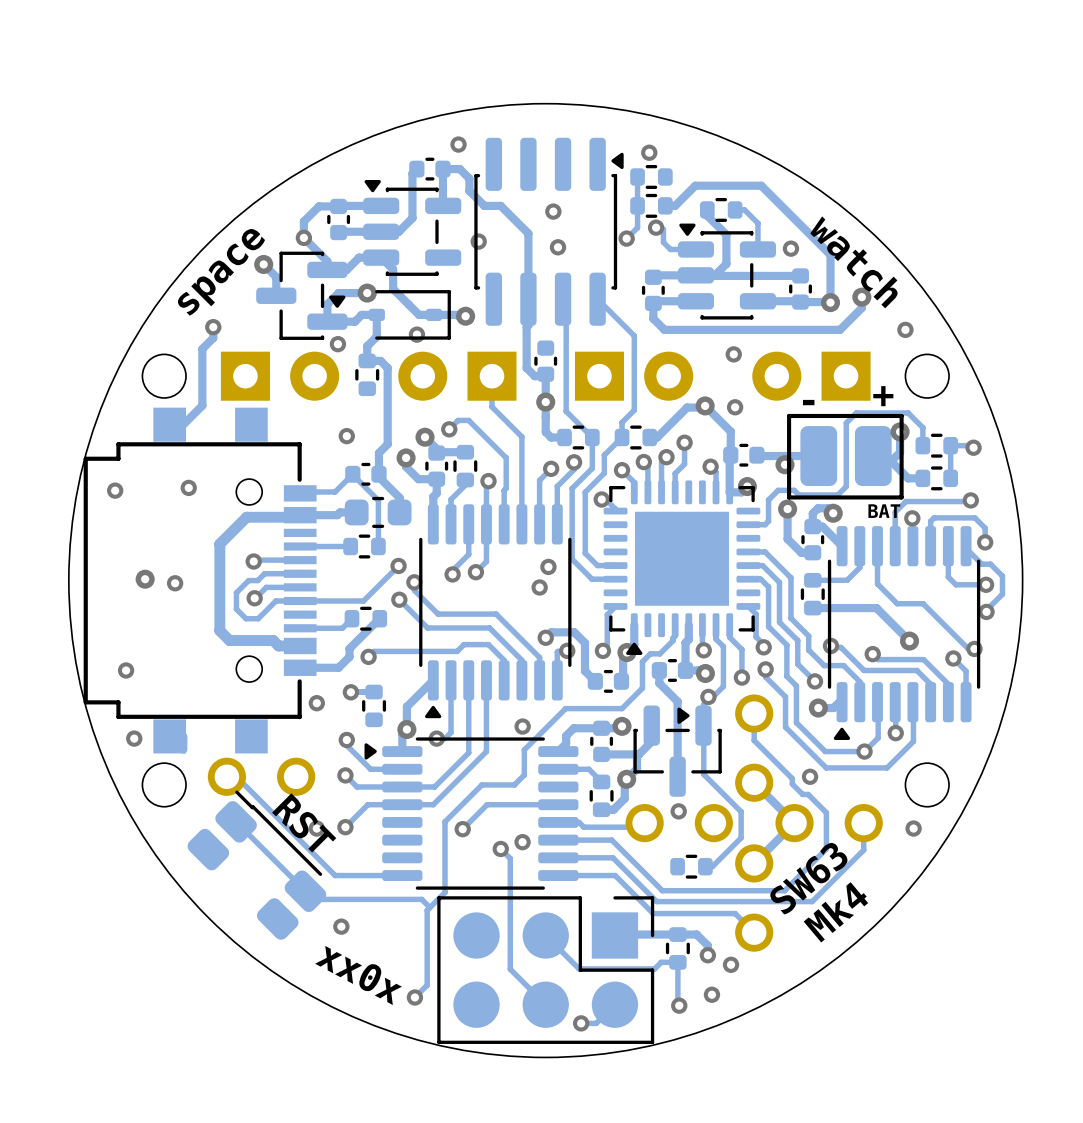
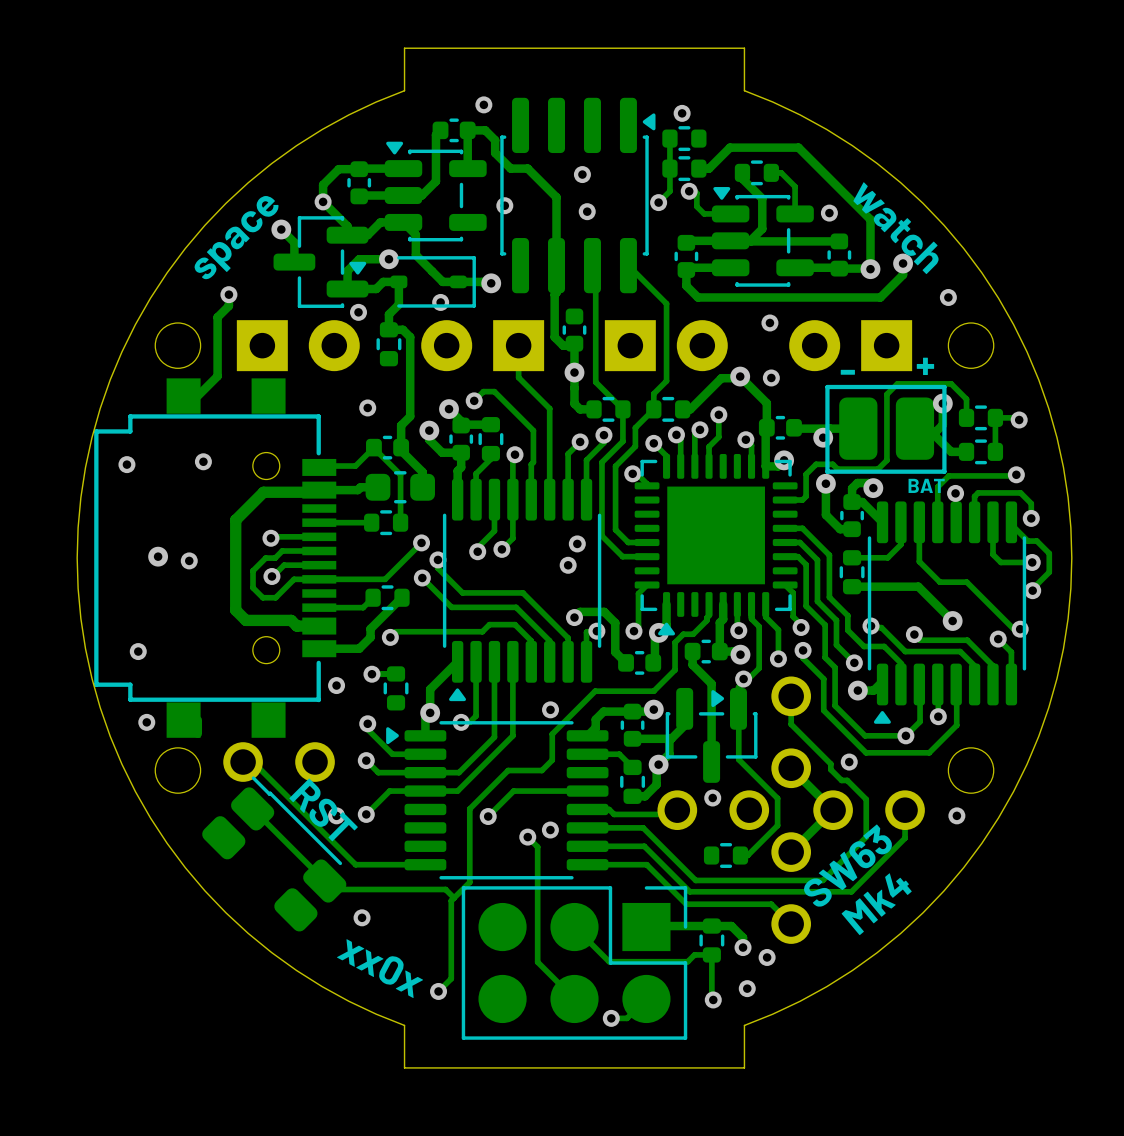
board edge: none -> (744, 48) (404, 48) (404, 90) (348, 114) (296, 145) (248, 182) (225, 203) (185, 248) (150, 298) (135, 324) (110, 379) (100, 408) (91, 437) (80, 497) (77, 558) (78, 588) (80, 618) (91, 678) (100, 707) (121, 764) (135, 791) (167, 843) (185, 867) (225, 912) (248, 933) (296, 970) (348, 1001) (404, 1025) (404, 1067) (744, 1067) (744, 1025) (800, 1001) (852, 970) (877, 952) (923, 912) (963, 867) (981, 843) (1013, 791) (1027, 764) (1048, 707) (1057, 678) (1068, 618) (1071, 558) (1070, 527) (1063, 467) (1057, 437) (1048, 408) (1027, 351) (998, 298) (981, 272) (963, 248) (923, 203) (877, 163) (852, 145) (800, 114) (744, 90) (744, 48)
round board edge: [68, 103, 1024, 1059] -> none

